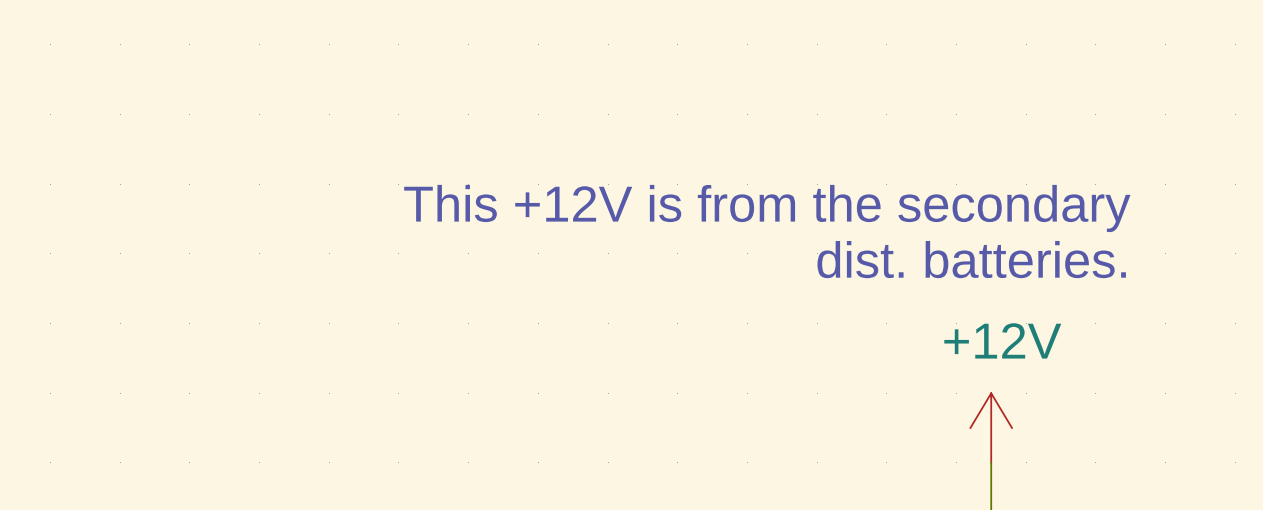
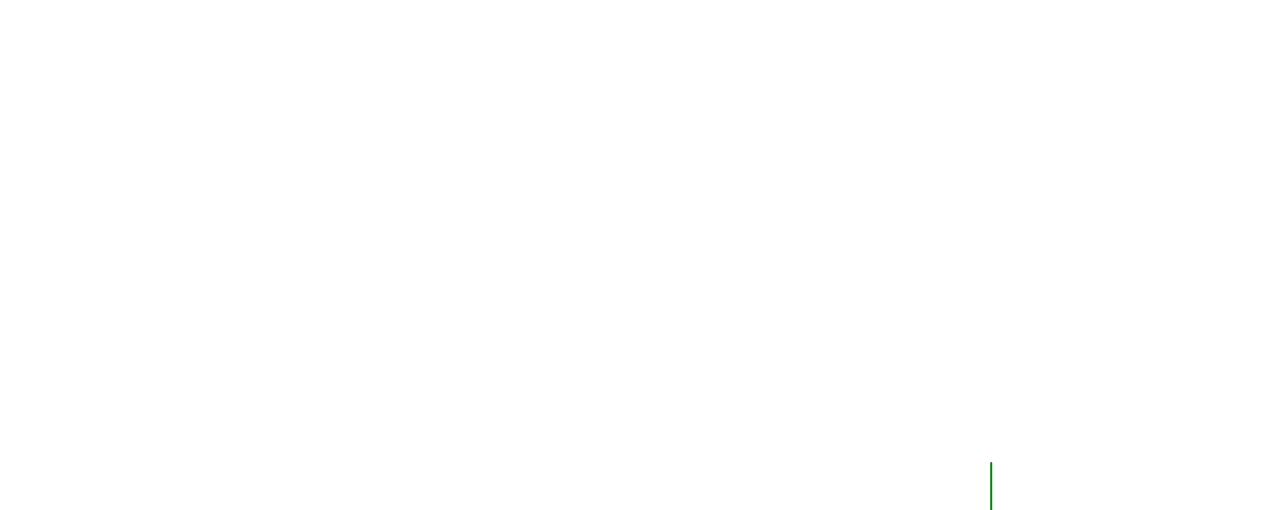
text: This +12V is from the secondary (767, 208) -> none
text: dist. batteries. (971, 259) -> none
power symbol: +12V (991, 428) -> none

